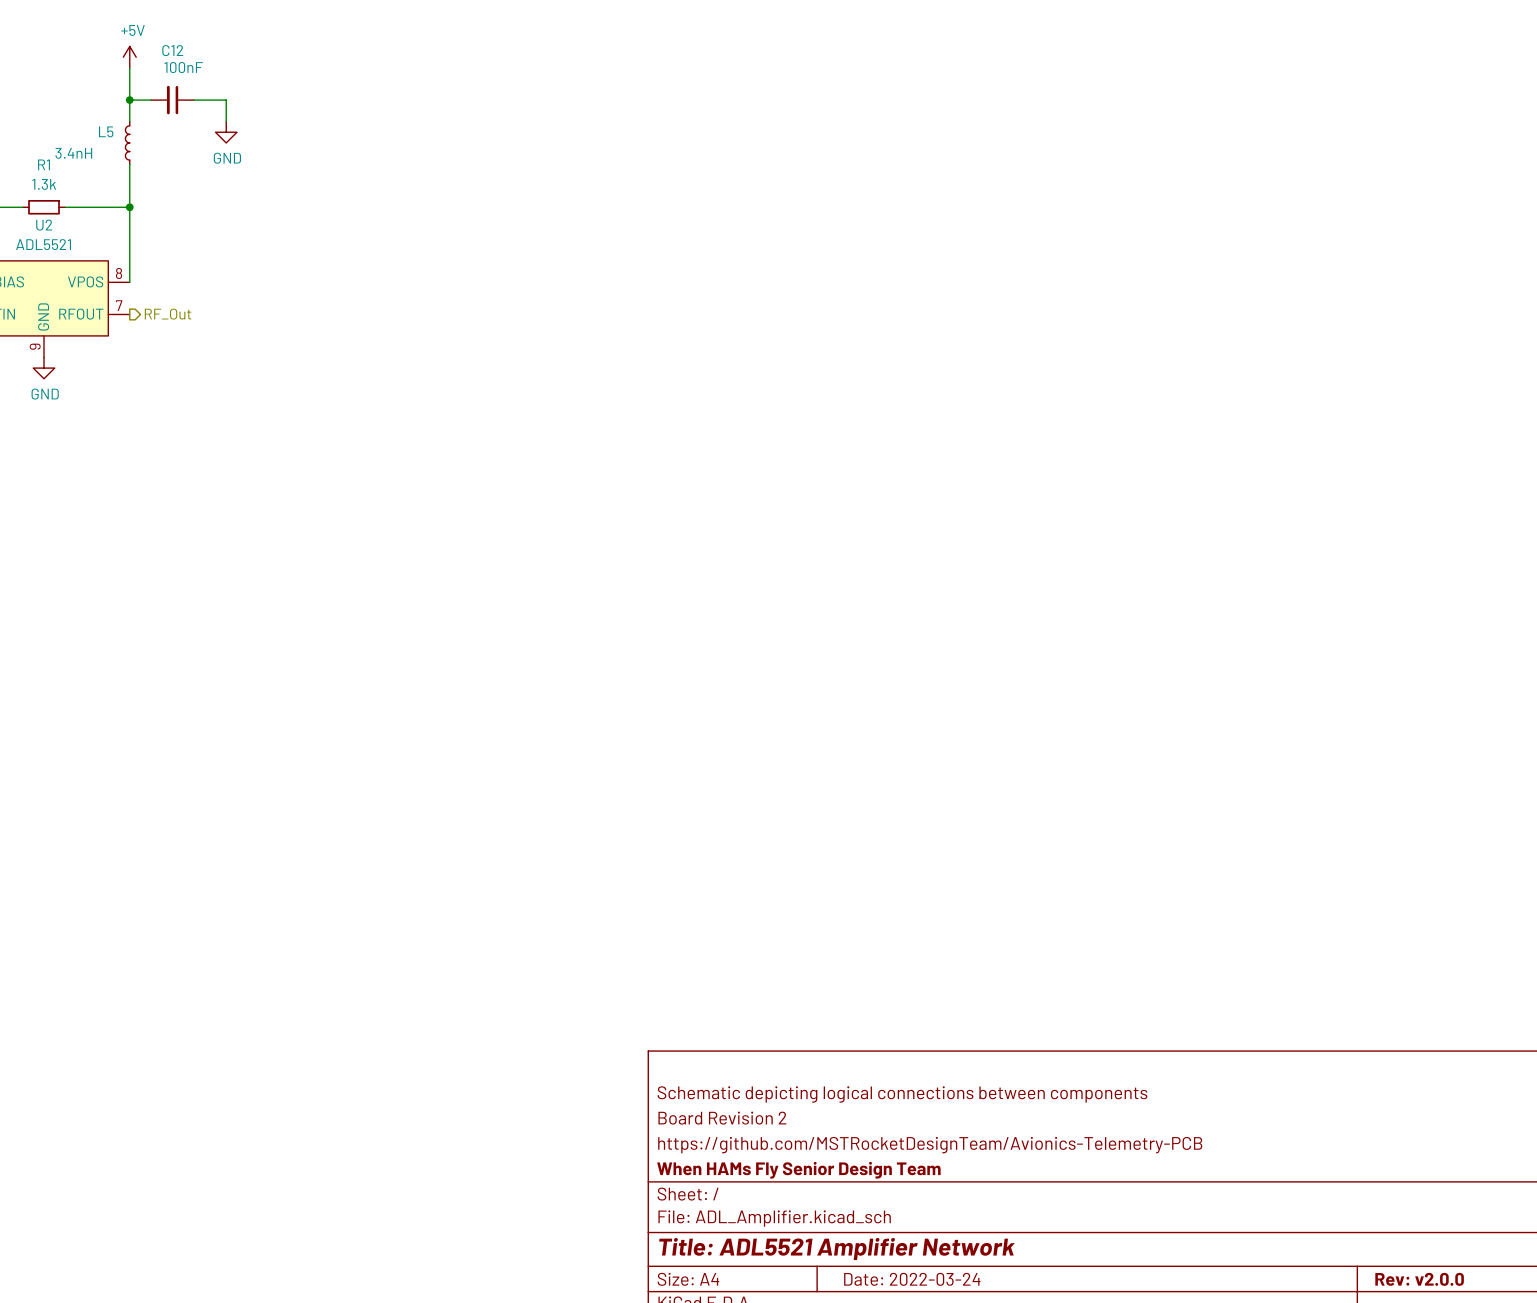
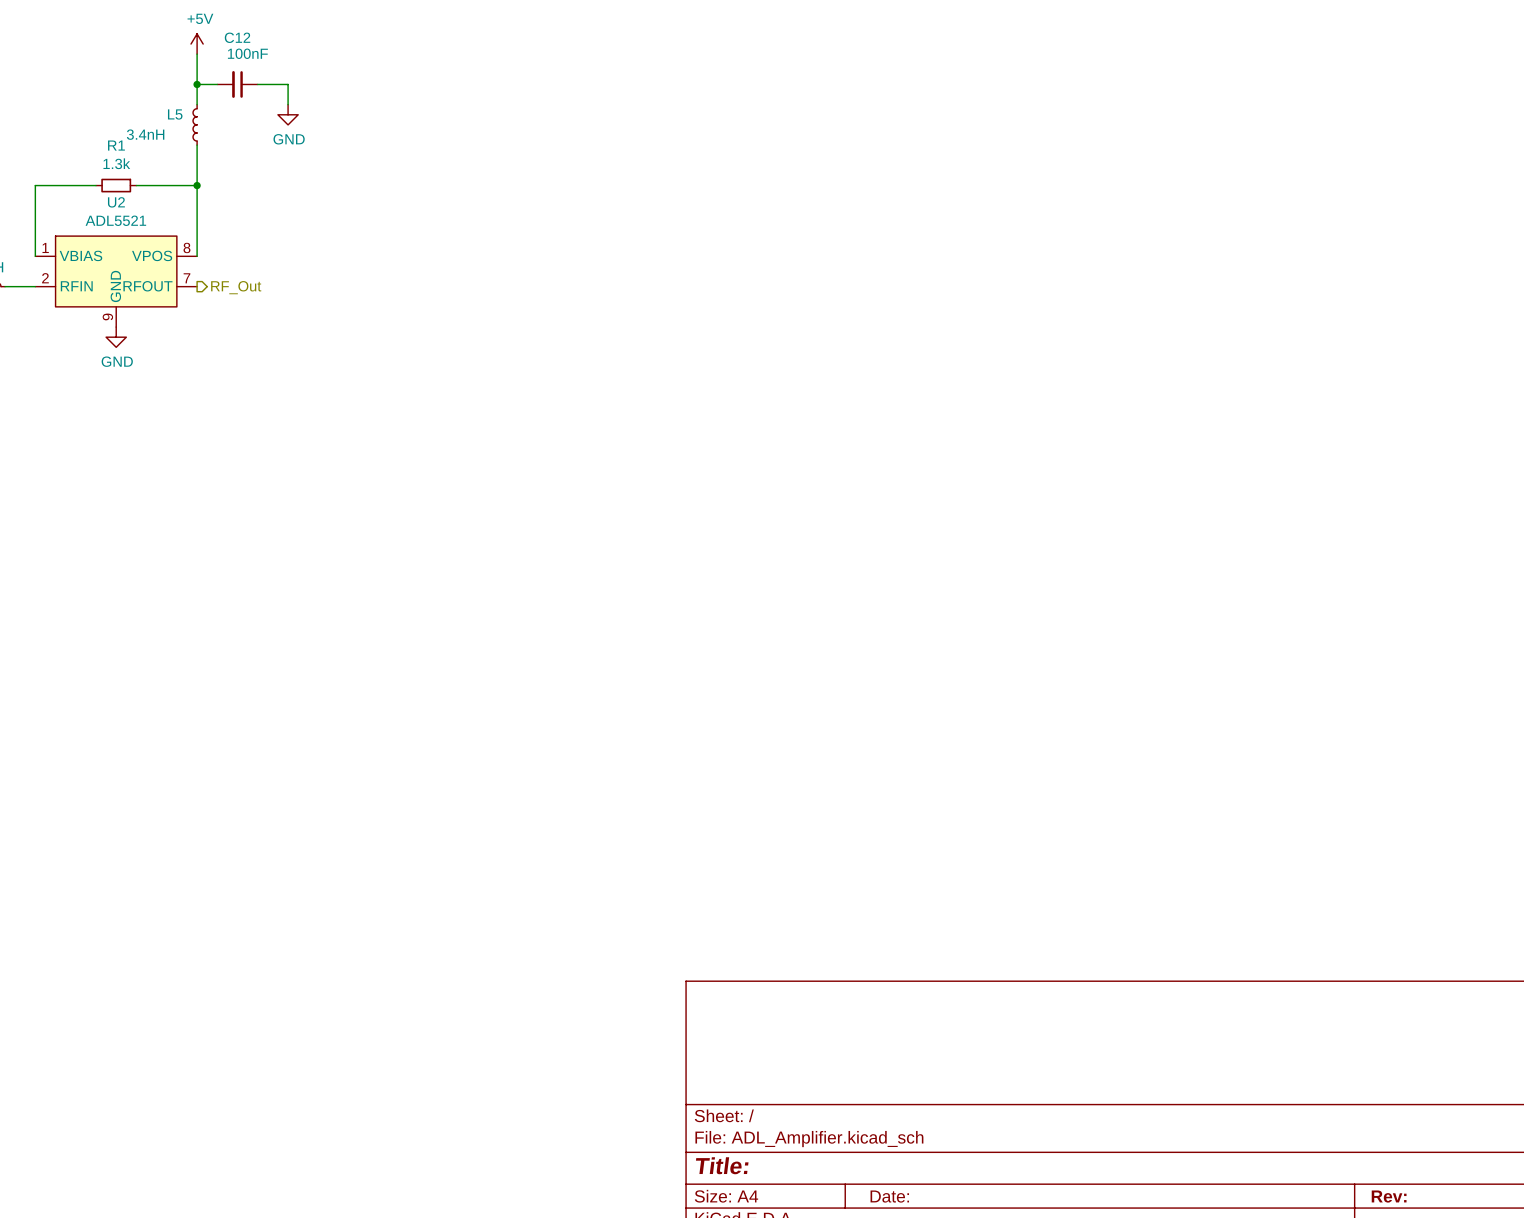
title block: Schematic depicting logical connections between components (902, 1094) -> none
title block: Board Revision 2 (722, 1118) -> none
title block: https://github.com/MSTRocketDesignTeam/Avionics-Telemetry-PCB (930, 1145) -> none
title block: When HAMs Fly Senior Design Team (798, 1170) -> none
title block: Title: ADL5521 Amplifier Network (836, 1248) -> Title: (722, 1165)
title block: Date: 2022-03-24 (912, 1279) -> Date: (889, 1196)
title block: Rev: v2.0.0 (1419, 1279) -> Rev: (1389, 1196)

